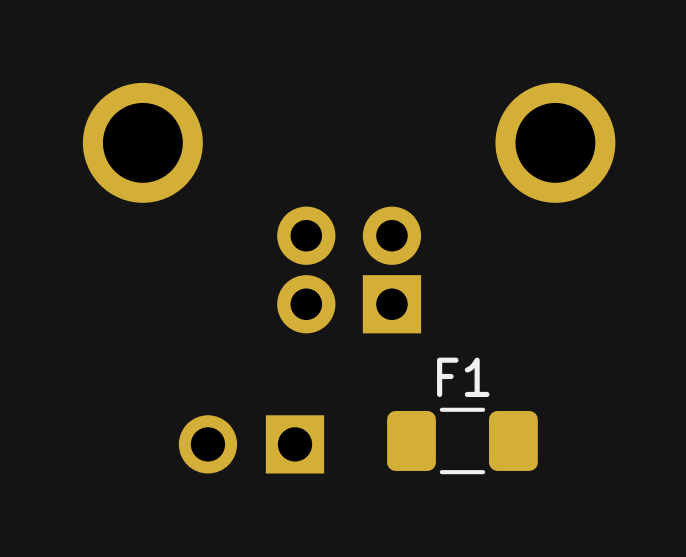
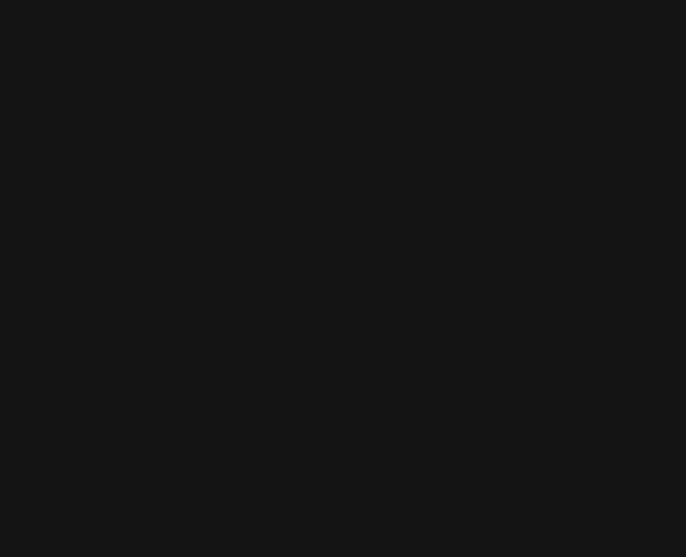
part: (349, 208) -> none
F1: (462, 440) -> none
part: (251, 444) -> none

